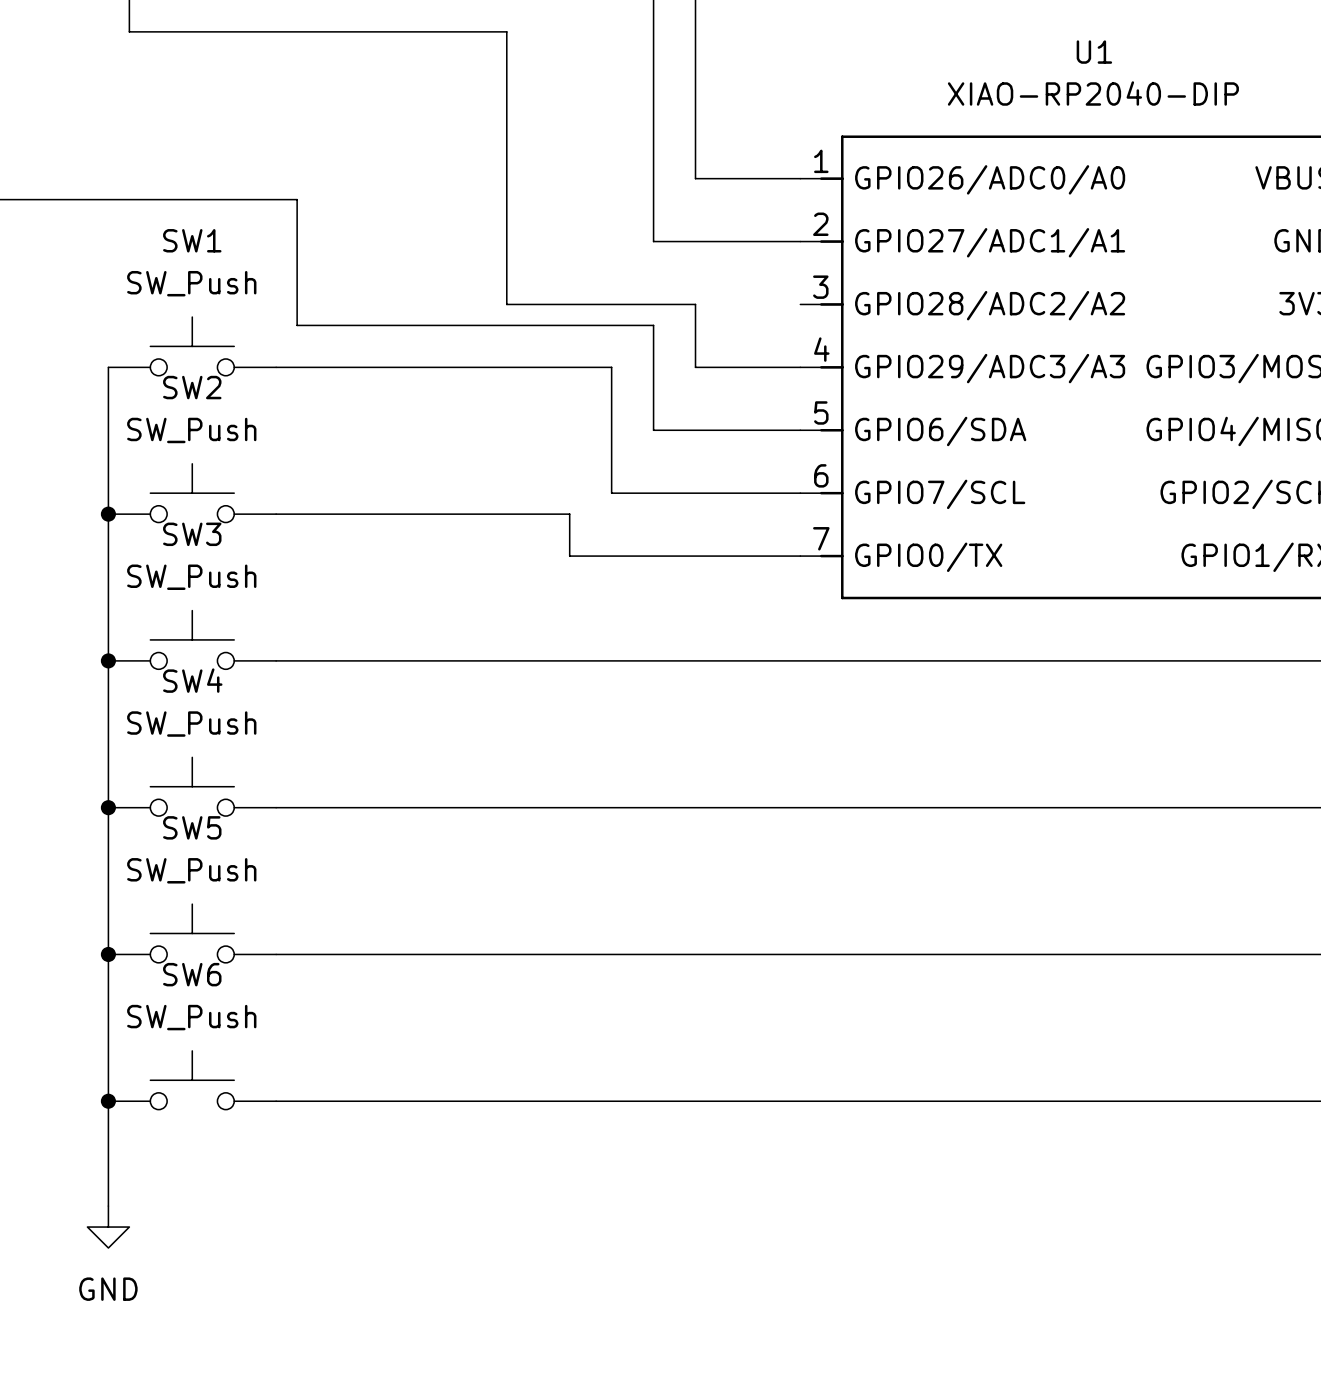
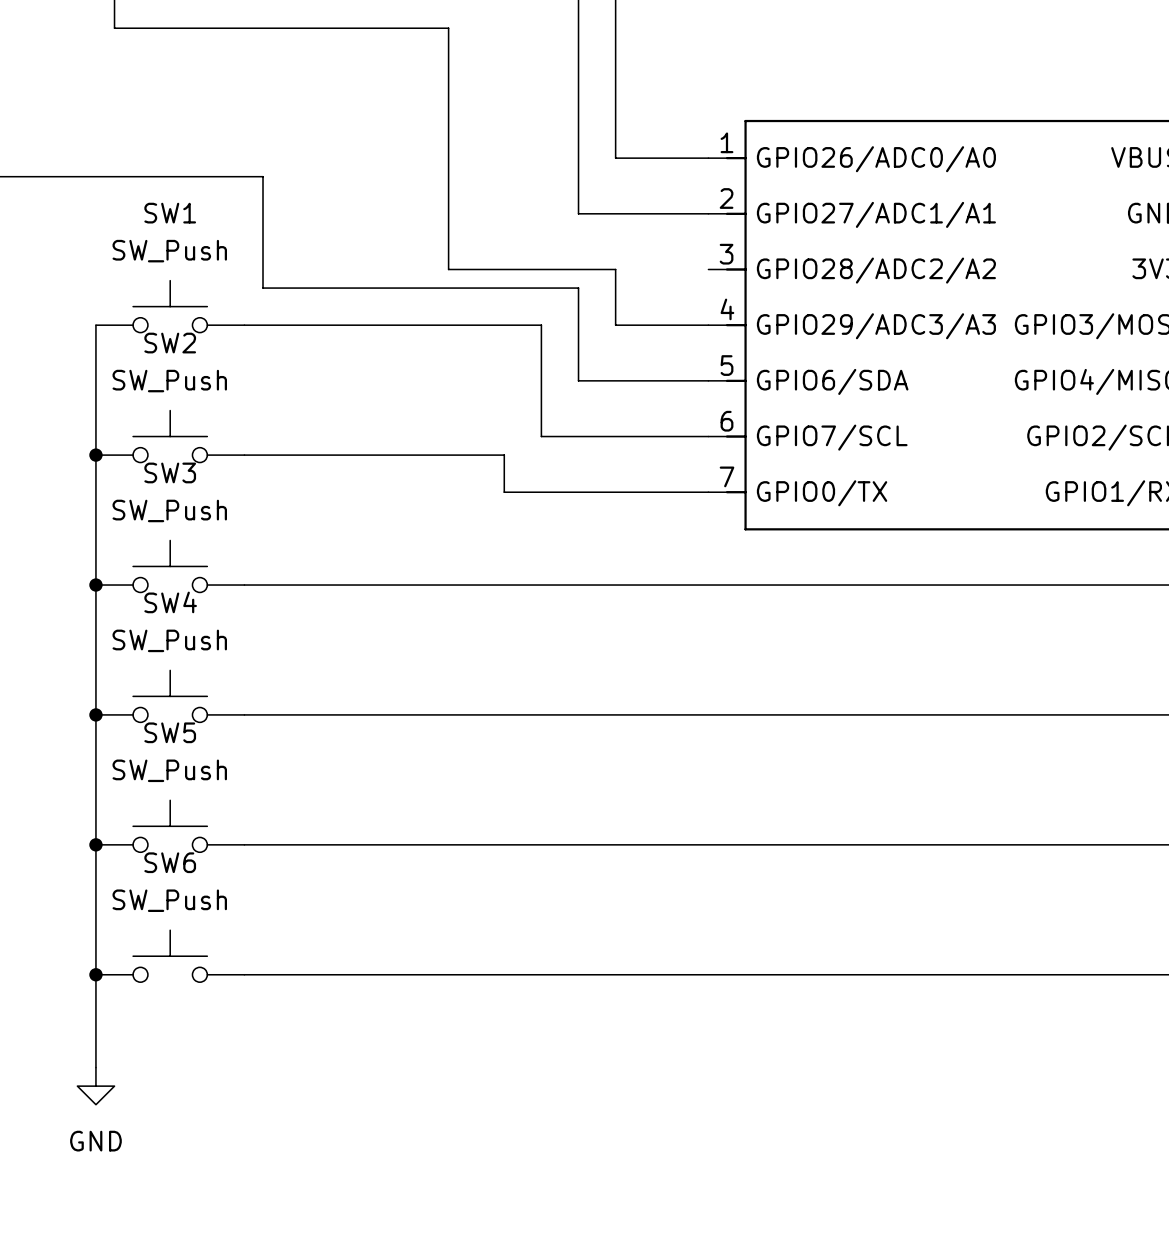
U1 name: U1 (1094, 52) -> none
U1 value: XIAO-RP2040-DIP (1093, 93) -> none

